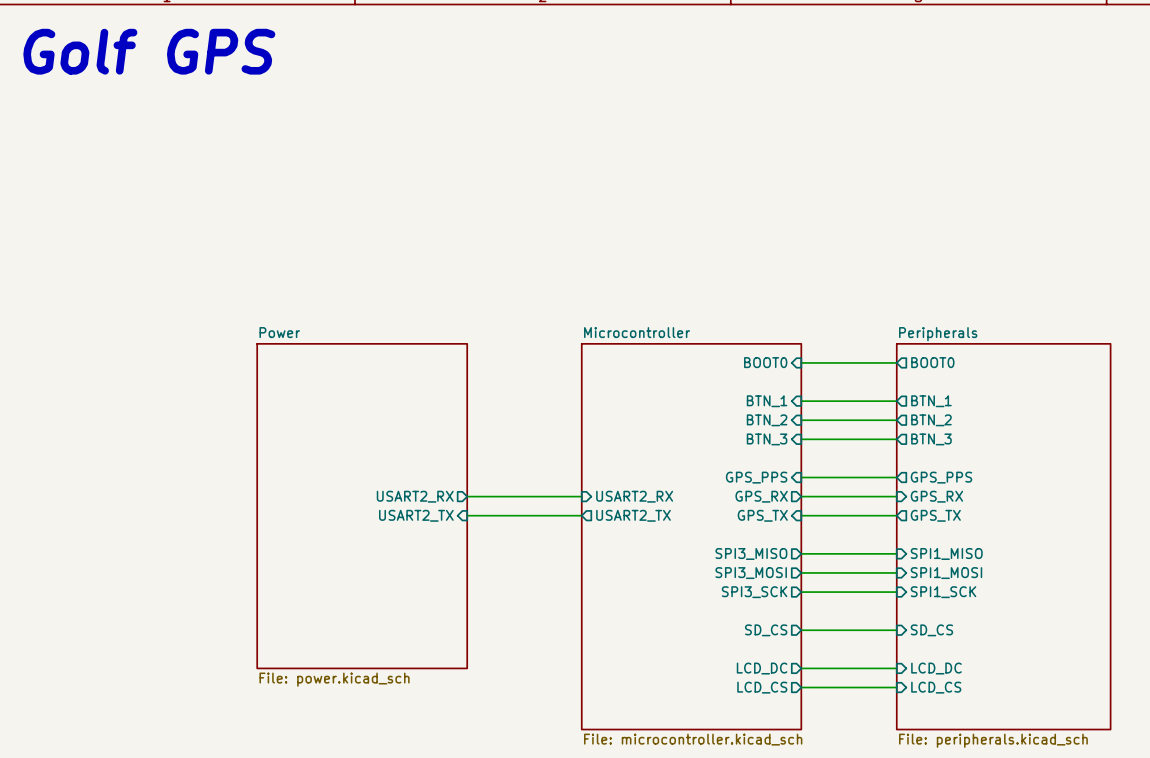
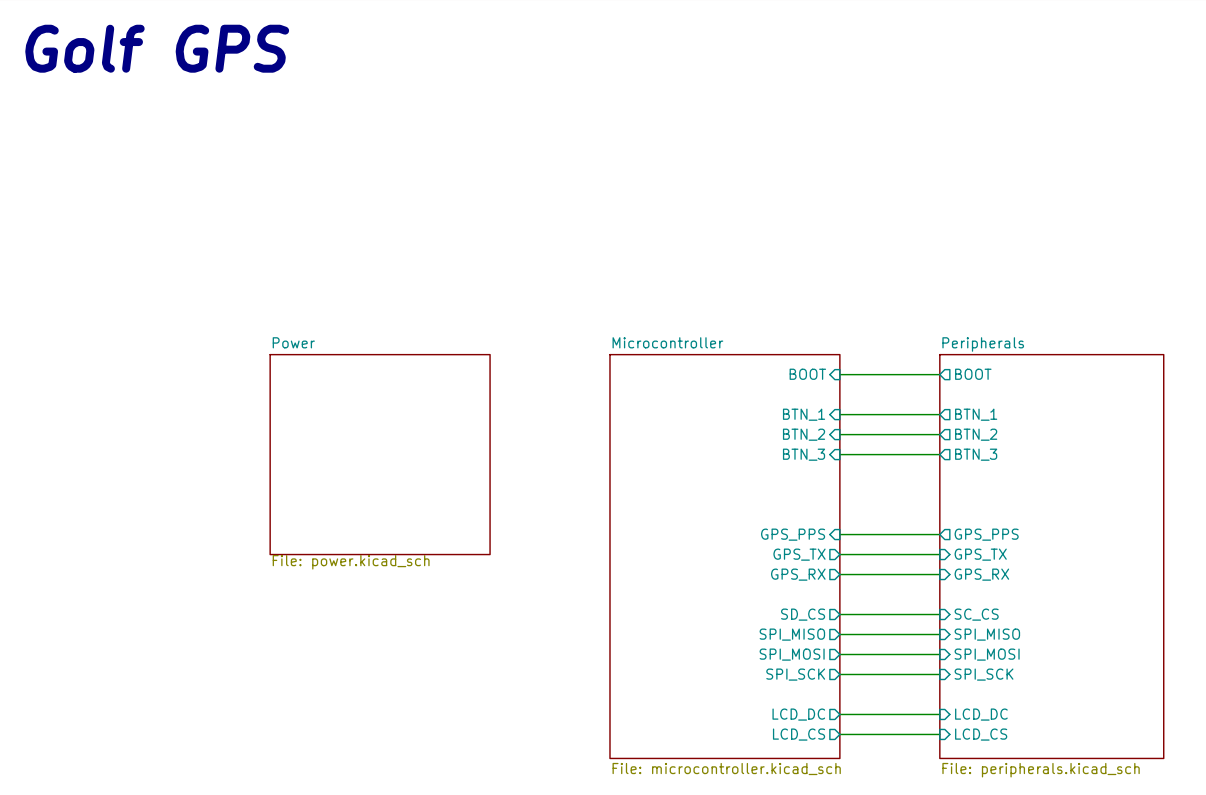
sheet pin: BOOT0 (765, 362) -> BOOT (807, 374)
sheet pin: BOOT0 (932, 362) -> BOOT (973, 374)
sheet Power: none -> File: power.kicad_sch (380, 454)
sheet pin: GPS_PPS (756, 477) -> none
wire: (801, 477) (896, 477) -> (839, 674) (939, 674)
sheet pin: GPS_PPS (941, 477) -> none
sheet pin: USART2_RX (415, 496) -> none
wire: (467, 496) (581, 496) -> none
sheet pin: USART2_RX (634, 496) -> none
sheet pin: GPS_RX (761, 496) -> none
wire: (801, 496) (896, 496) -> (839, 554) (939, 554)
sheet pin: GPS_RX (936, 496) -> none
sheet Power: File: power.kicad_sch (362, 506) -> none
sheet pin: USART2_TX (416, 515) -> none
wire: (467, 515) (581, 515) -> none
sheet pin: USART2_TX (633, 515) -> none
sheet pin: GPS_TX (762, 515) -> GPS_PPS (793, 534)
sheet pin: GPS_TX (935, 515) -> GPS_PPS (986, 534)
sheet pin: none -> GPS_TX (799, 554)
sheet pin: none -> GPS_TX (980, 554)
sheet pin: SPI3_MISO (751, 553) -> GPS_RX (798, 574)
sheet pin: SPI1_MISO (946, 553) -> GPS_RX (981, 574)
wire: (801, 572) (896, 572) -> (839, 634) (939, 634)
sheet pin: SPI3_MOSI (751, 573) -> none
sheet pin: SPI1_MOSI (946, 573) -> none
sheet pin: SPI3_SCK (754, 592) -> SD_CS (803, 614)
sheet pin: SPI1_SCK (943, 592) -> SC_CS (976, 614)
sheet pin: none -> SPI_MISO (792, 634)
sheet pin: none -> SPI_MISO (987, 634)
sheet pin: SD_CS (766, 630) -> SPI_MOSI (792, 654)
sheet pin: SD_CS (931, 630) -> SPI_MOSI (987, 654)
sheet pin: none -> SPI_SCK (795, 674)
sheet pin: none -> SPI_SCK (984, 674)
sheet pin: LCD_DC (762, 668) -> none
wire: (801, 668) (896, 668) -> (839, 734) (939, 734)
sheet pin: LCD_DC (936, 668) -> none
sheet pin: LCD_CS (762, 687) -> LCD_DC (798, 714)
sheet pin: LCD_CS (936, 687) -> LCD_DC (981, 714)
sheet pin: none -> LCD_CS (799, 734)
sheet pin: none -> LCD_CS (981, 734)

